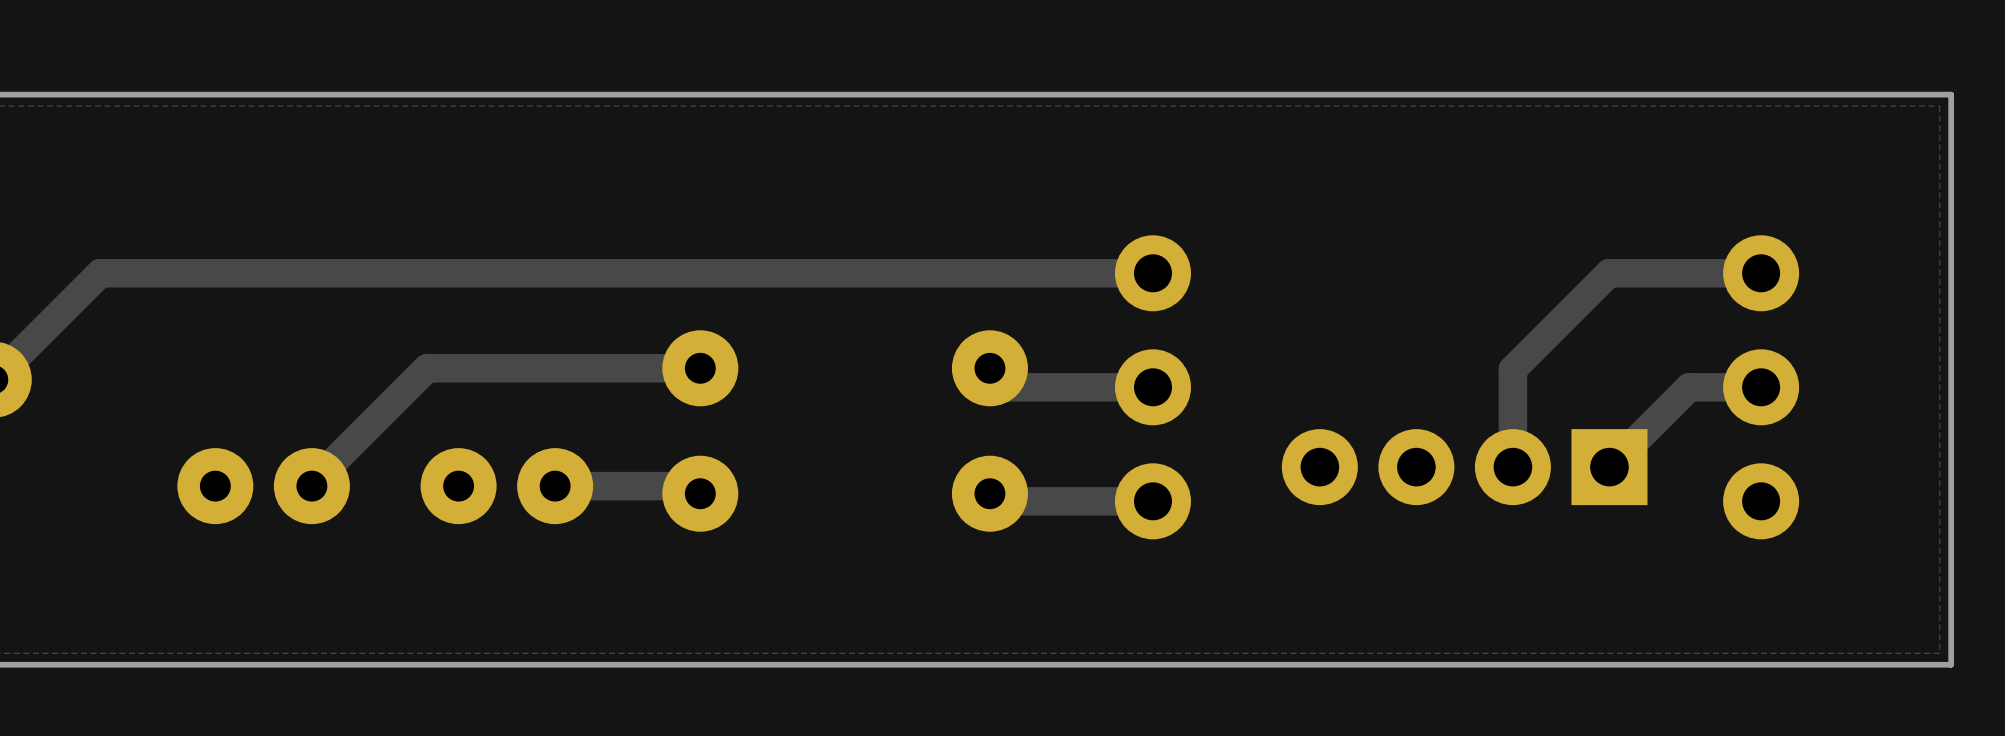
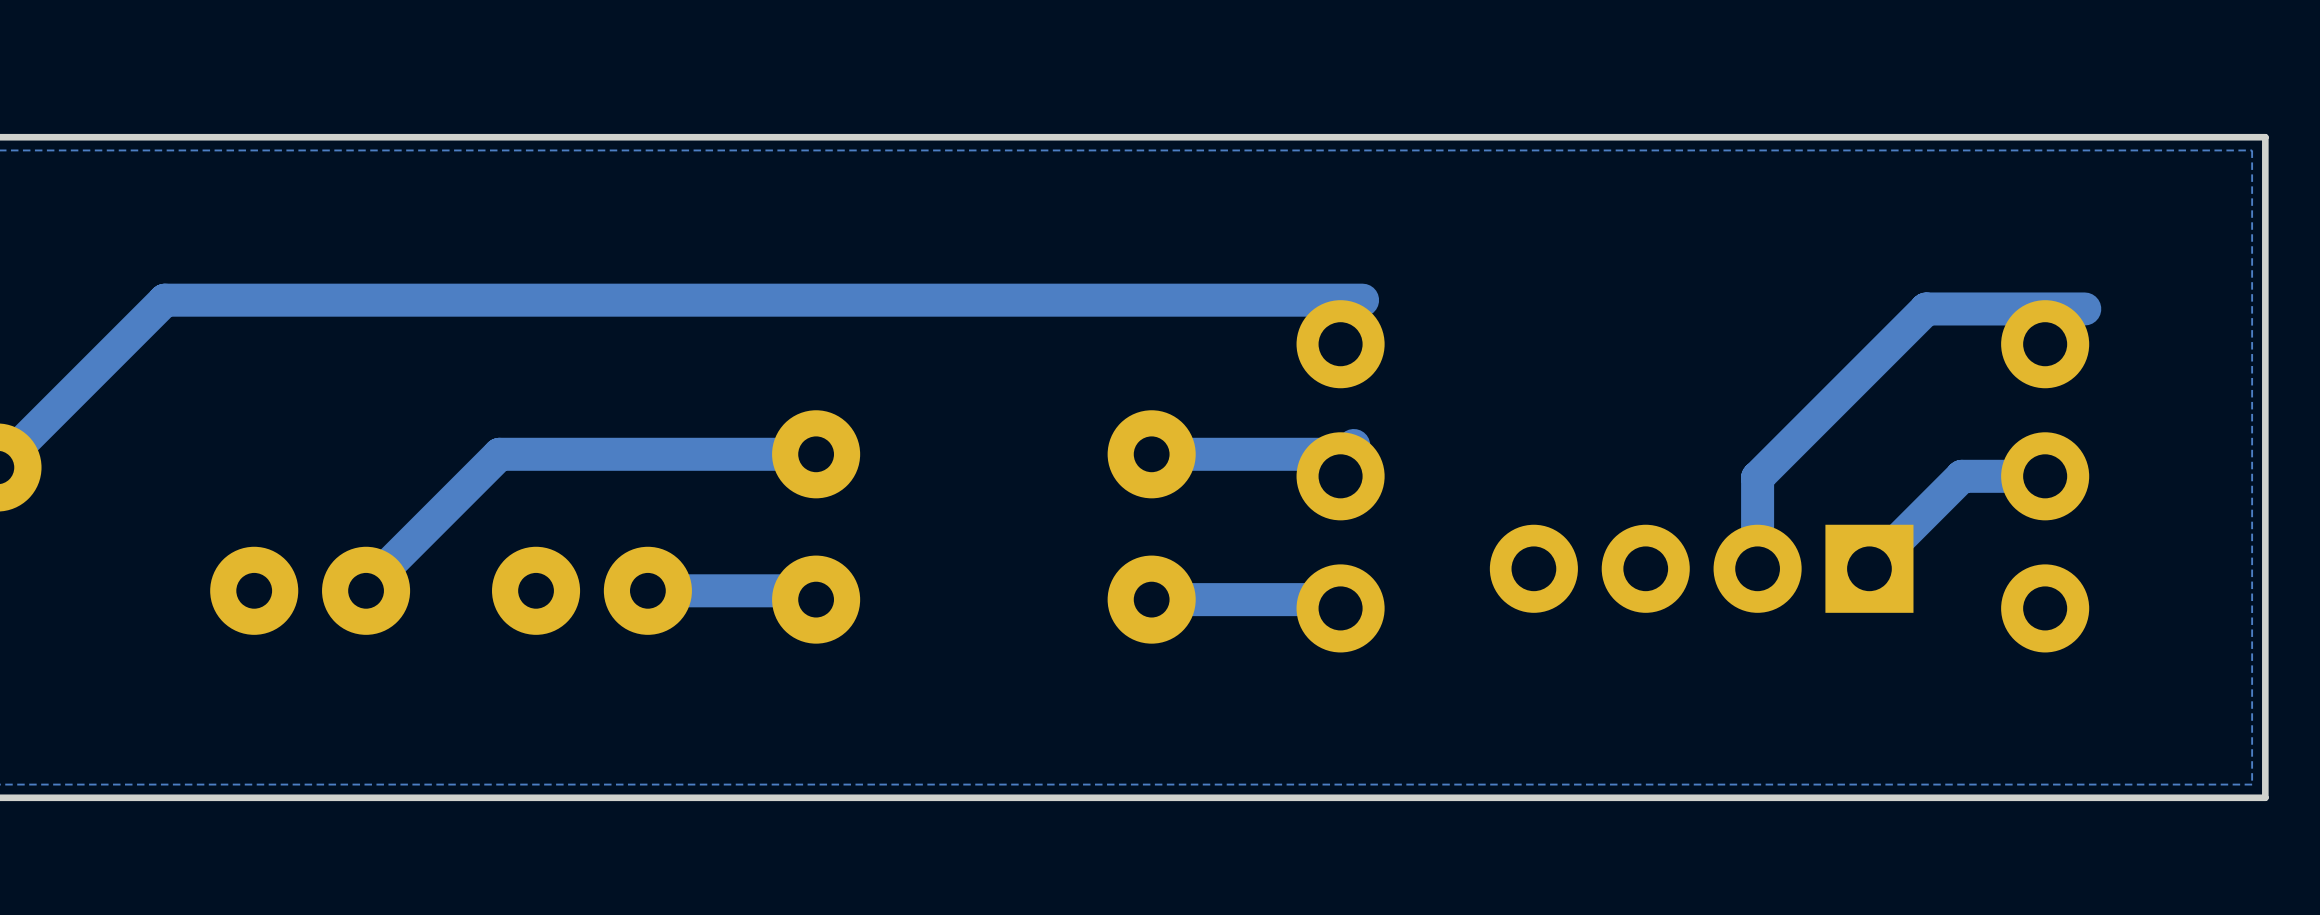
track: (1153, 273) (100, 273) -> (1362, 300) (164, 300) (120, 344)
track: (1761, 273) (1609, 273) (1512, 369) (1512, 388) -> (2084, 308) (1926, 308) (1757, 477)
track: (989, 368) (1008, 387) (1153, 387) -> (1151, 454) (1344, 454) (1353, 445)
track: (989, 493) (997, 501) (1153, 501) -> (1151, 599) (1353, 599)

